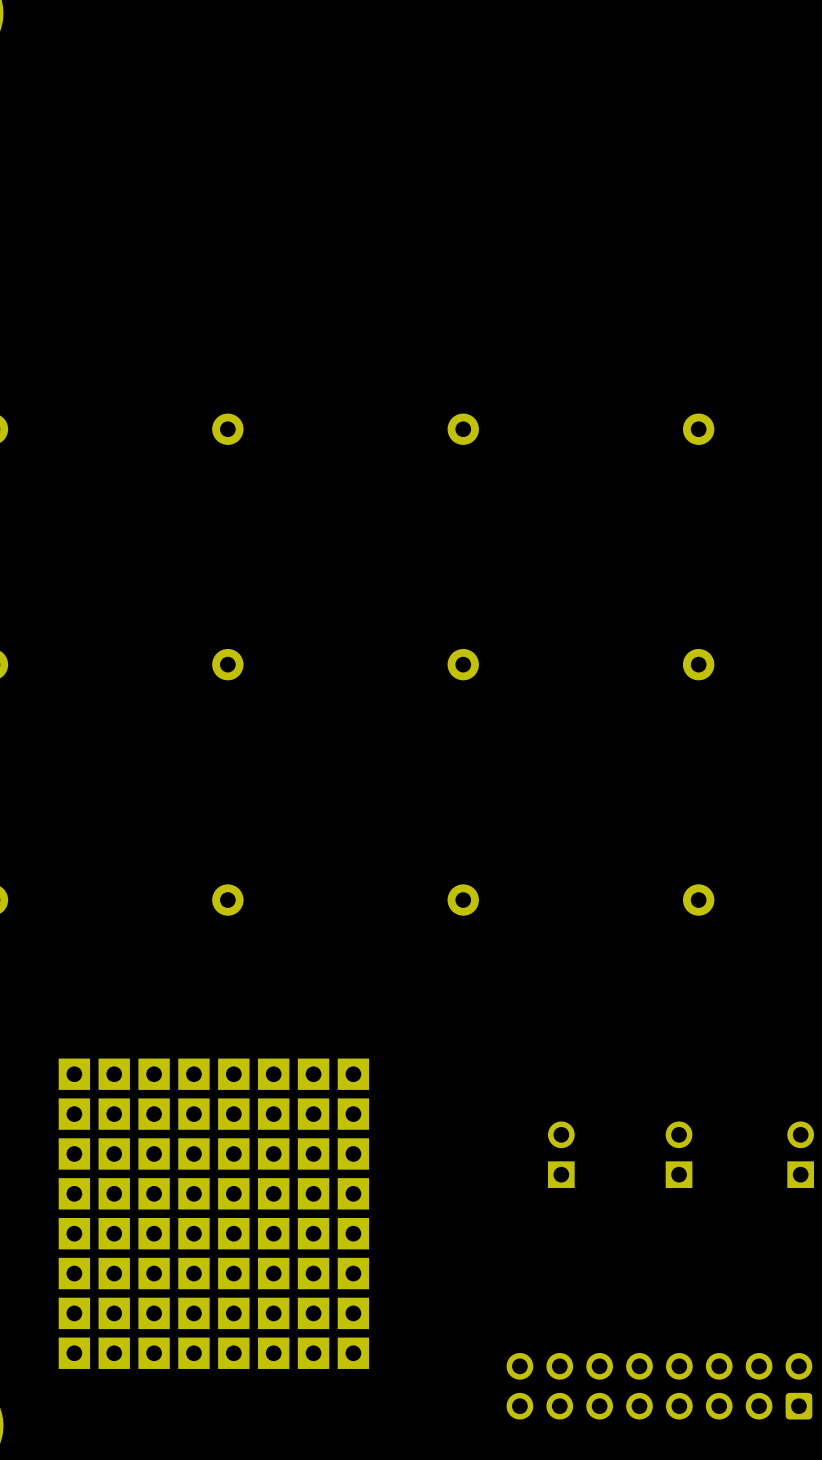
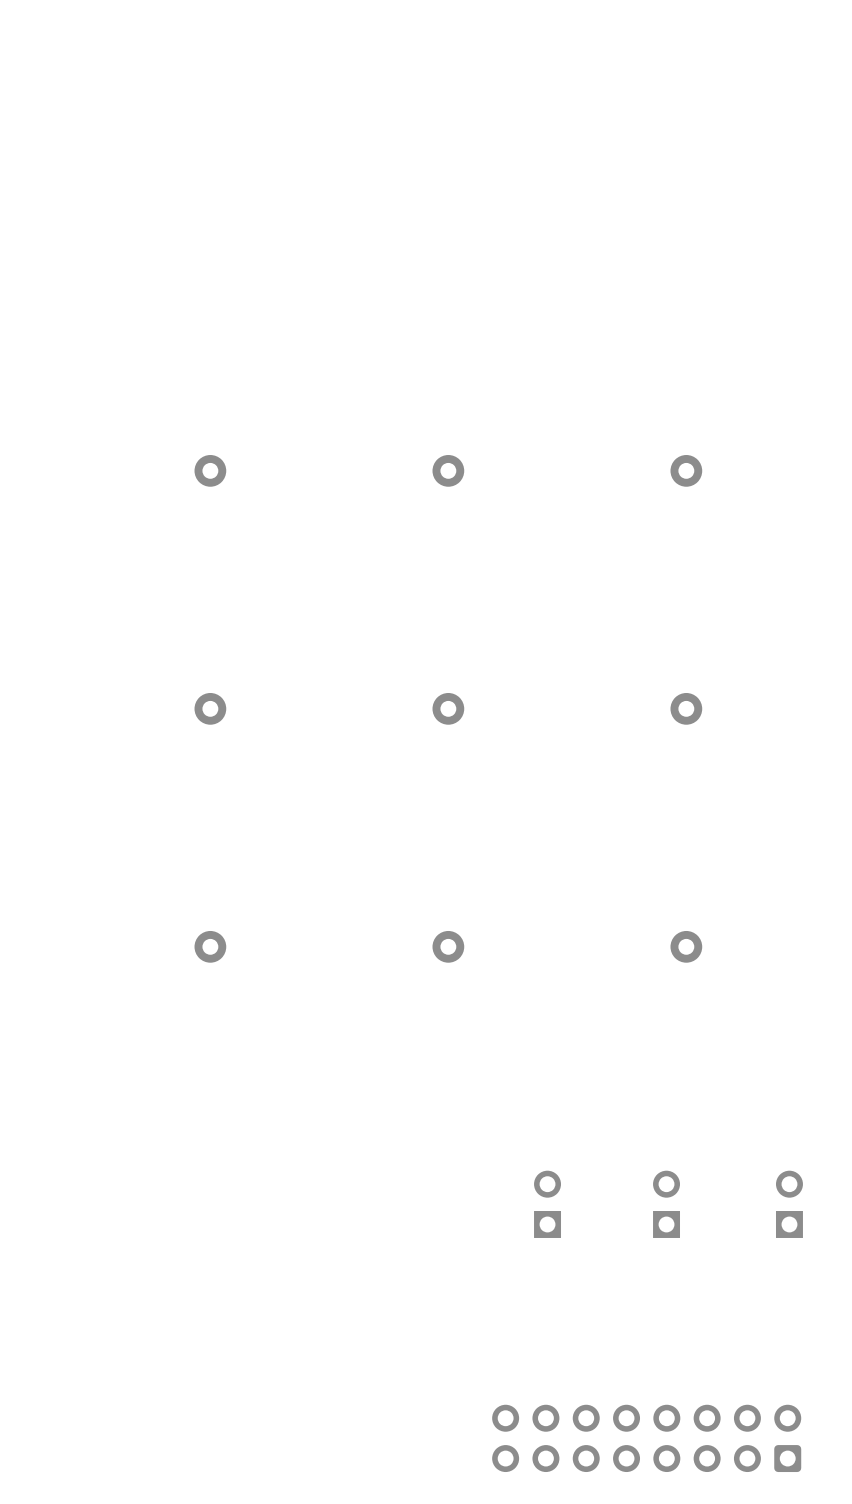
part: (213, 1213) -> none

